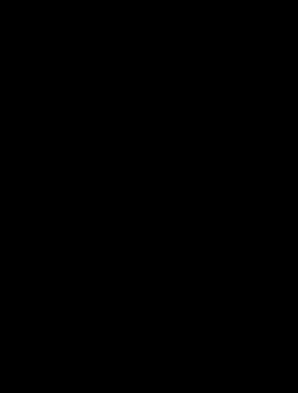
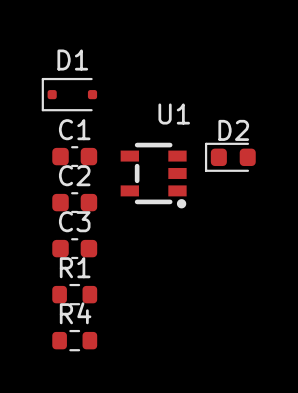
D1: none -> (69, 94)
C1: none -> (74, 156)
D2: none -> (230, 157)
U1: none -> (153, 175)
C2: none -> (74, 202)
C3: none -> (74, 248)
R1: none -> (74, 294)
R4: none -> (74, 340)

